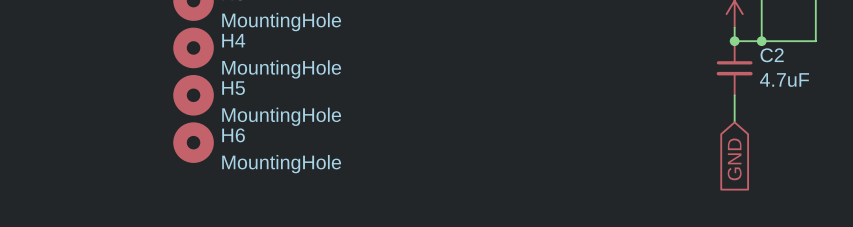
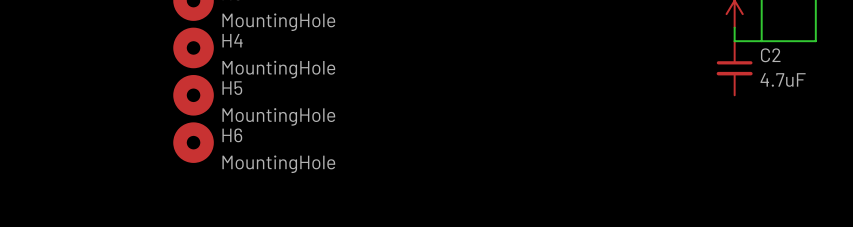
junction: (734, 41) -> none
junction: (761, 41) -> none
wire: (734, 95) (734, 122) -> none
global label: GND (734, 159) -> none

